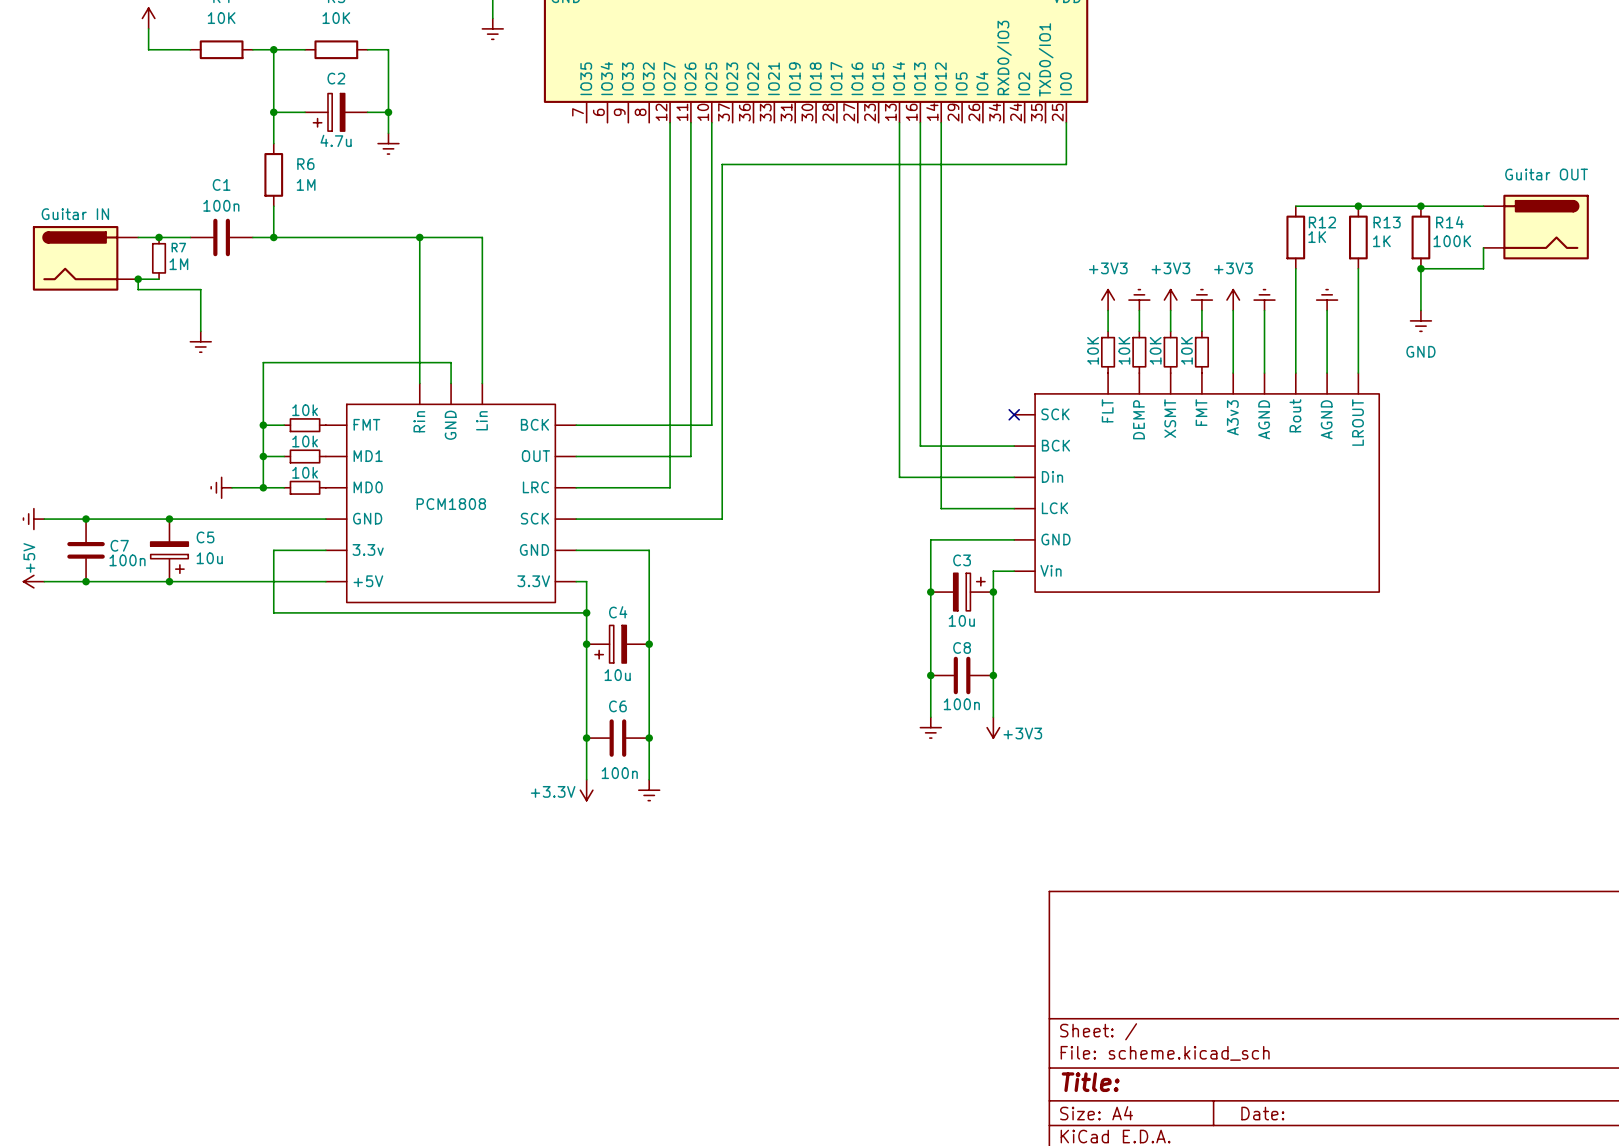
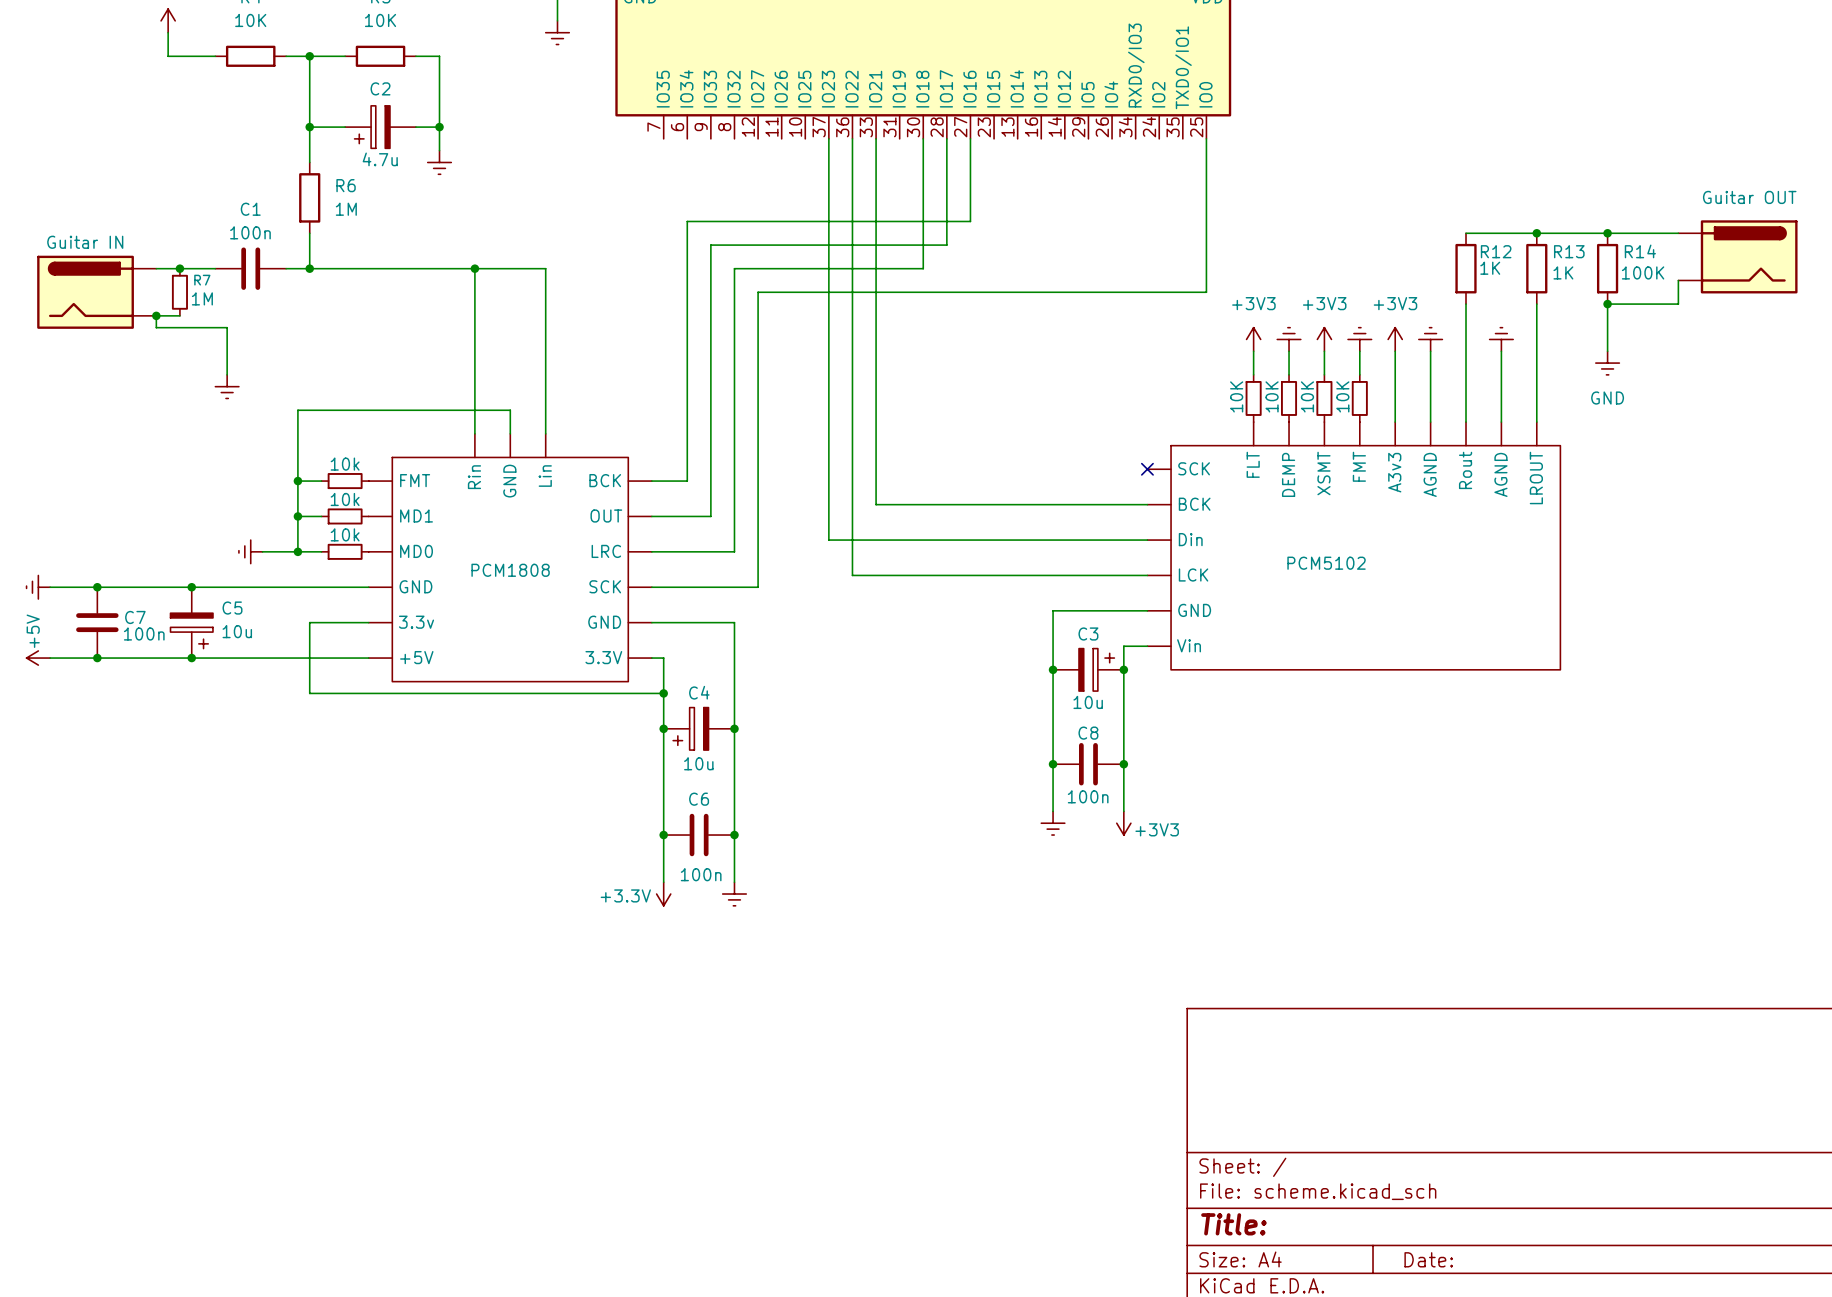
wire: (670, 122) (670, 258) -> none
wire: (690, 122) (690, 456) (628, 456) -> (946, 138) (946, 245) (710, 245) (710, 516)
wire: (711, 122) (711, 425) (607, 425) -> (970, 138) (970, 221) (687, 221) (687, 481)
wire: none -> (923, 138) (923, 268) (734, 268) (734, 551)
wire: (899, 122) (899, 477) -> (828, 138) (828, 540) (1017, 540)
wire: (920, 122) (920, 446) -> (876, 138) (876, 504) (1041, 504)
wire: (941, 122) (941, 508) -> (852, 138) (852, 575) (1064, 575)
wire: (1066, 164) (722, 164) (722, 519) (670, 519) -> (1206, 186) (1206, 292) (758, 292)
wire: (649, 487) (670, 487) -> (758, 587) (758, 551)
PCM5102 name: none -> PCM5102 (1326, 563)

